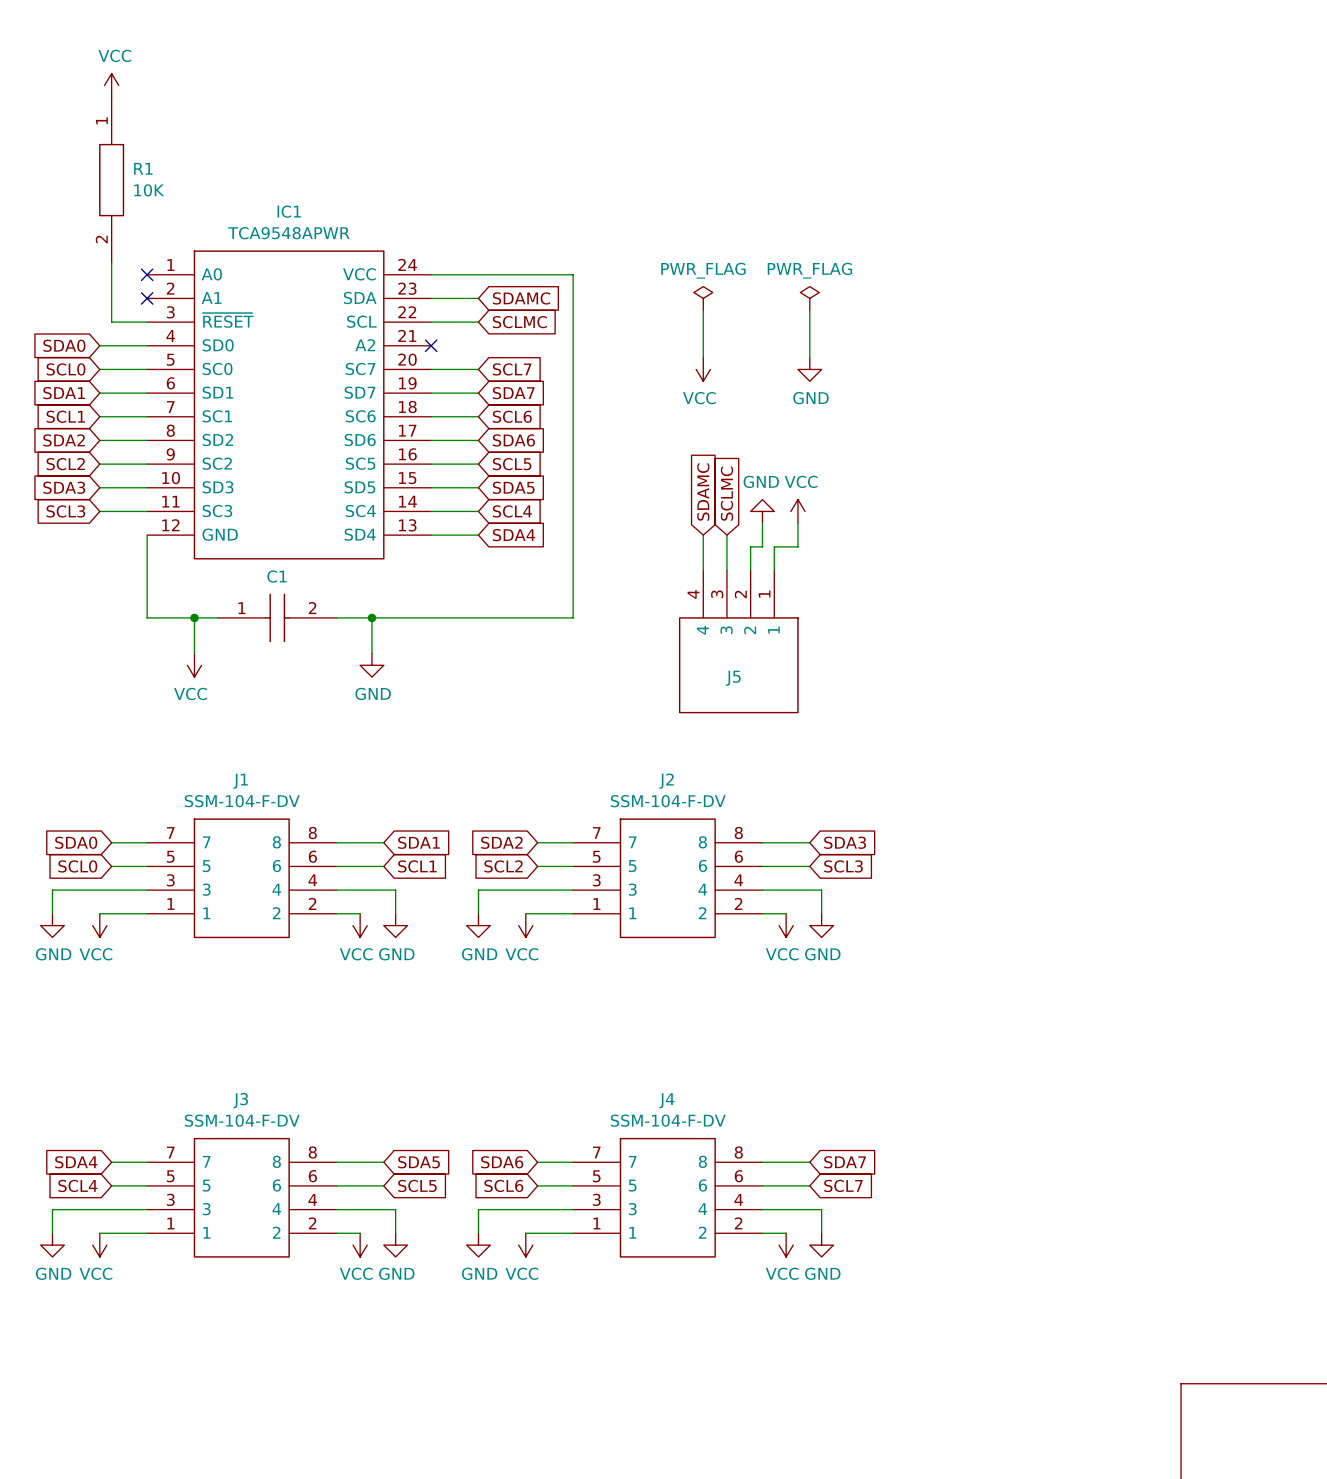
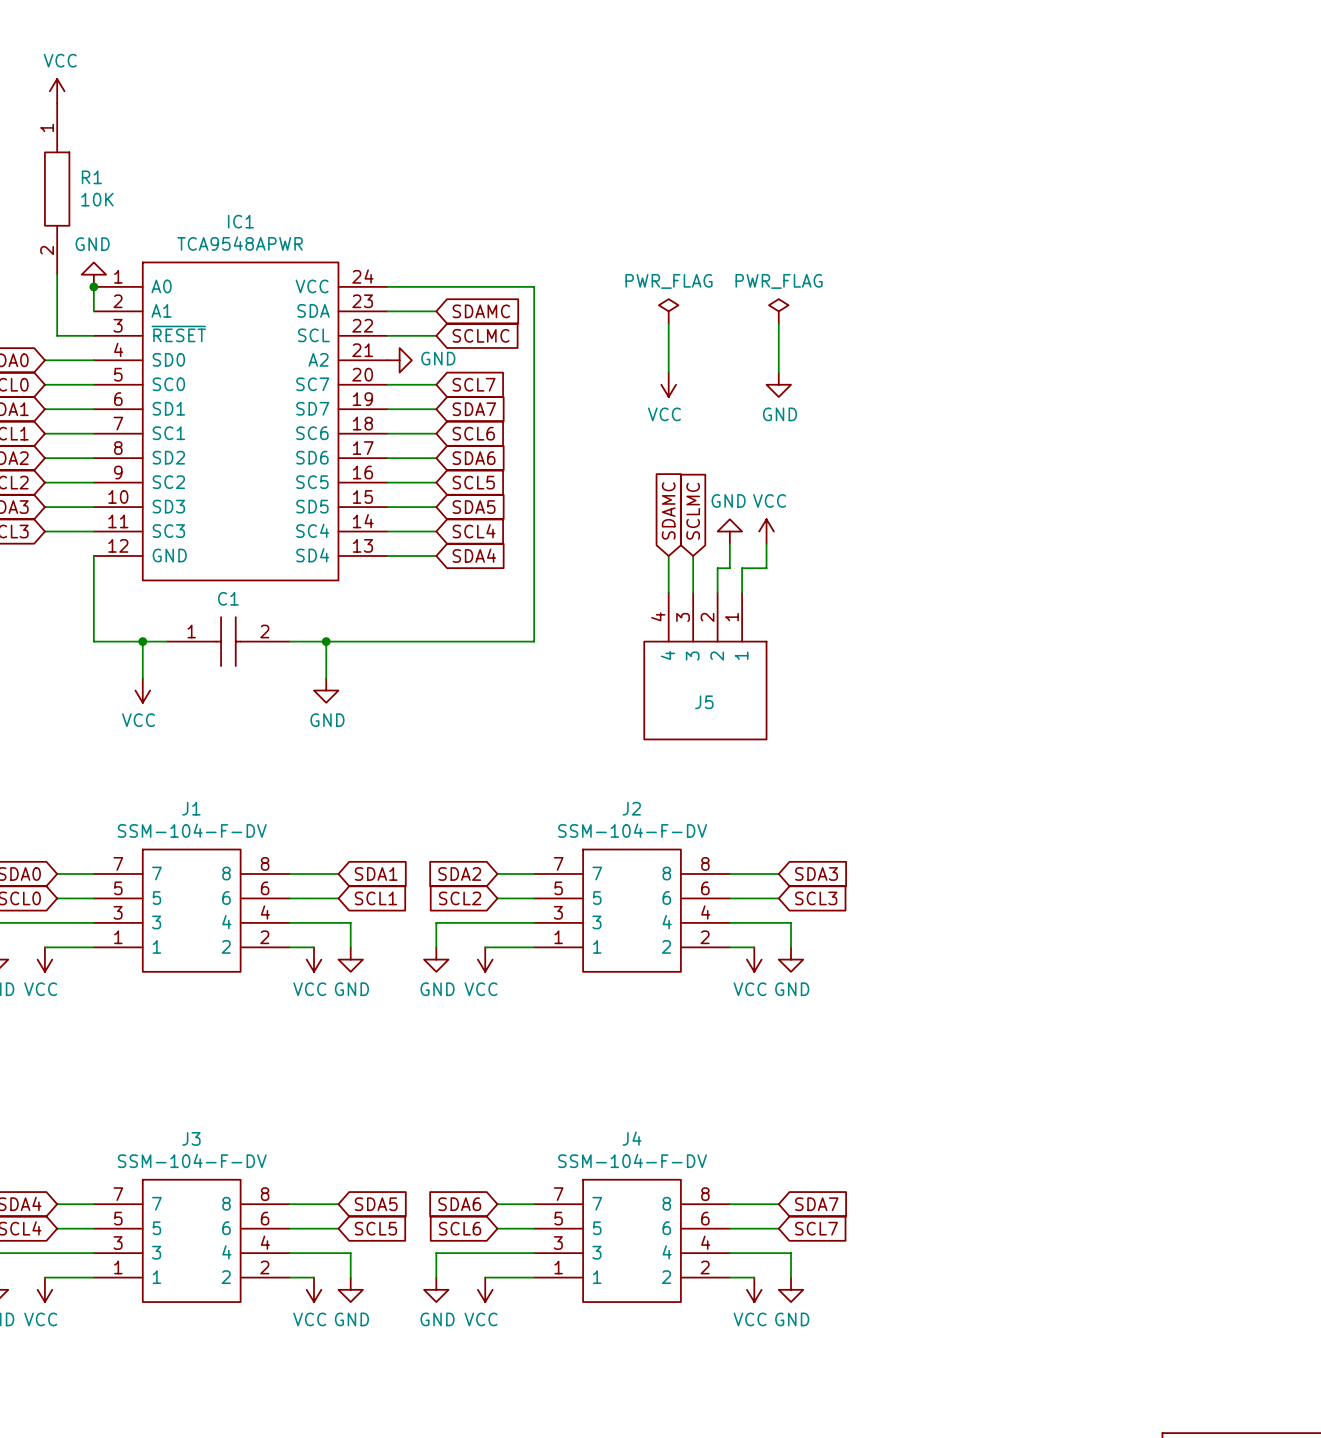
power symbol: none -> GND (93, 274)
wire: none -> (93, 286) (93, 311)
no-connect mark: (147, 274) -> none
junction: none -> (93, 286)
no-connect mark: (147, 298) -> none
no-connect mark: (431, 345) -> none
power symbol: none -> GND (399, 360)

